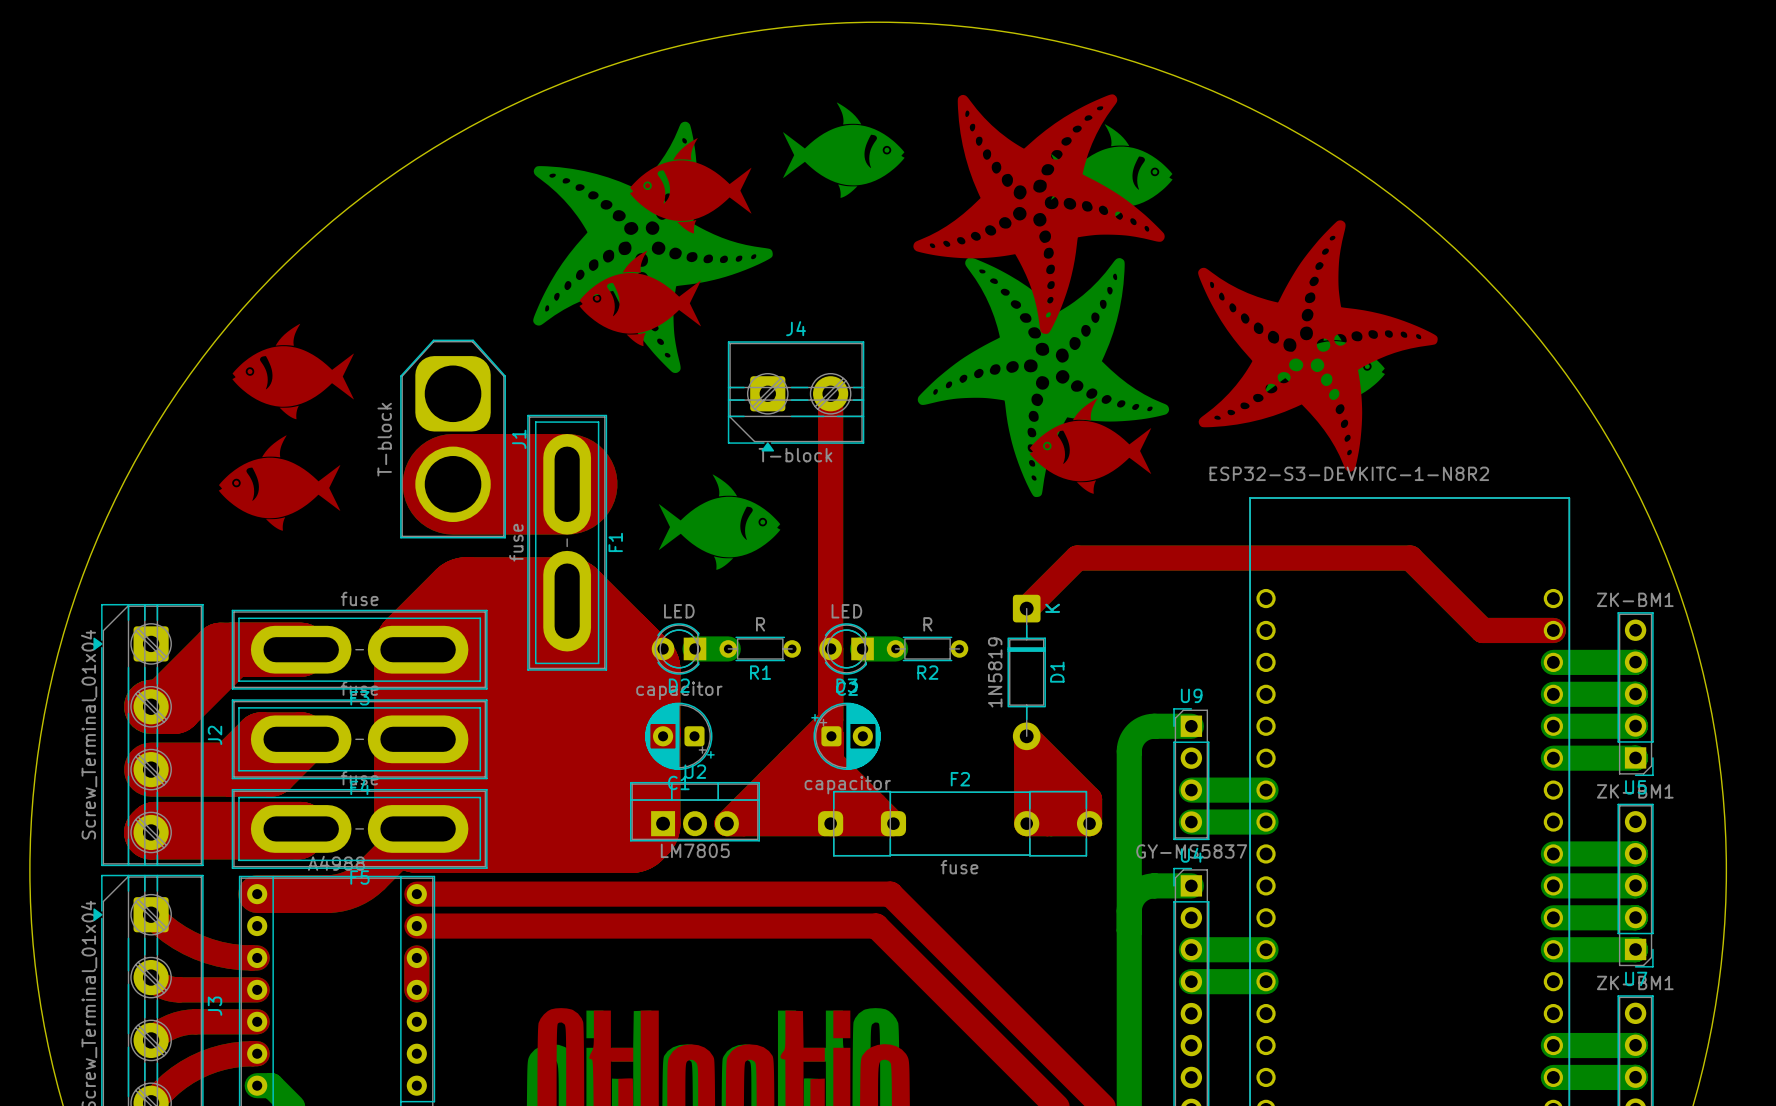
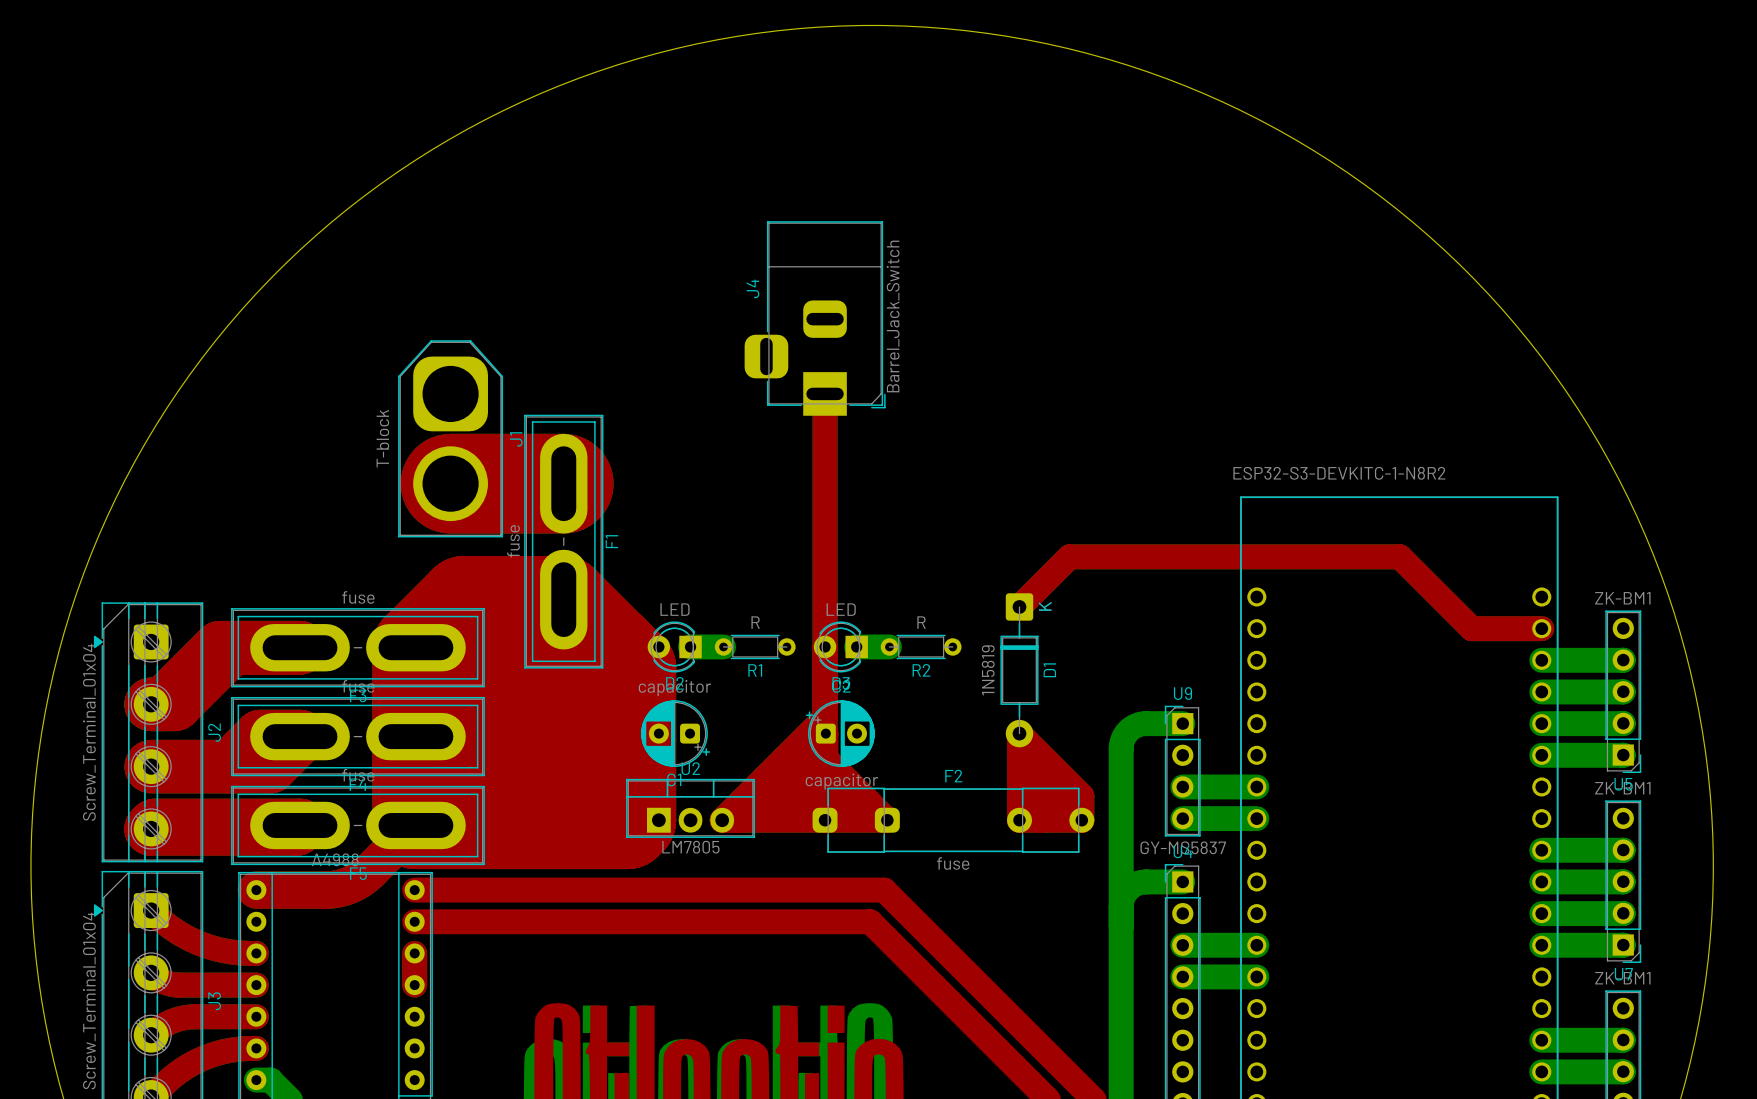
drawing: [533, 94, 1173, 498] -> none
drawing: [1198, 220, 1438, 472] -> none
drawing: [232, 323, 354, 420] -> none
J4 name position: J4 (796, 328) -> J4 (752, 288)
J4 footprint: [727, 341, 865, 452] -> [744, 221, 886, 416]
drawing: [218, 435, 341, 531] -> none
J4 value: T-block (795, 455) -> Barrel_Jack_Switch (893, 316)
drawing: [658, 474, 781, 570] -> none

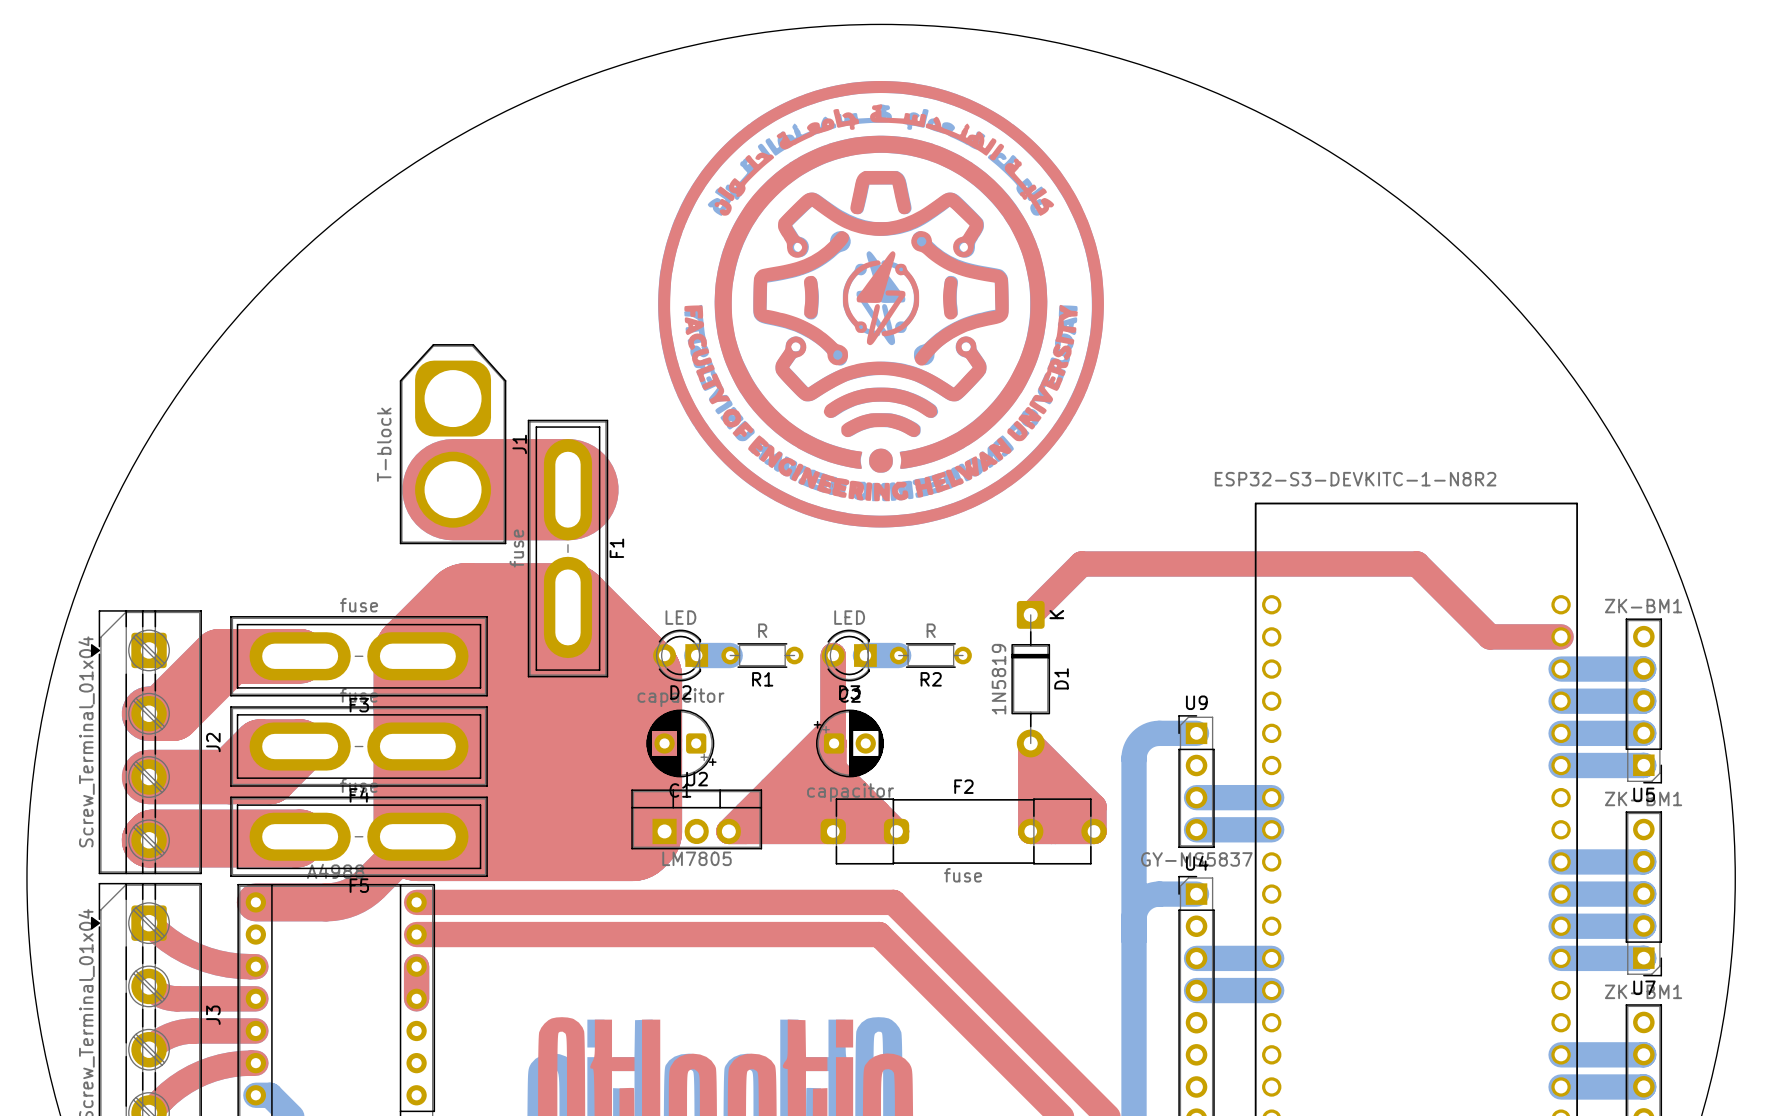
drawing: none -> [658, 81, 1104, 528]
J4: Barrel_Jack_Switch (815, 318) -> none
top track: (825, 393) (825, 646) -> none

